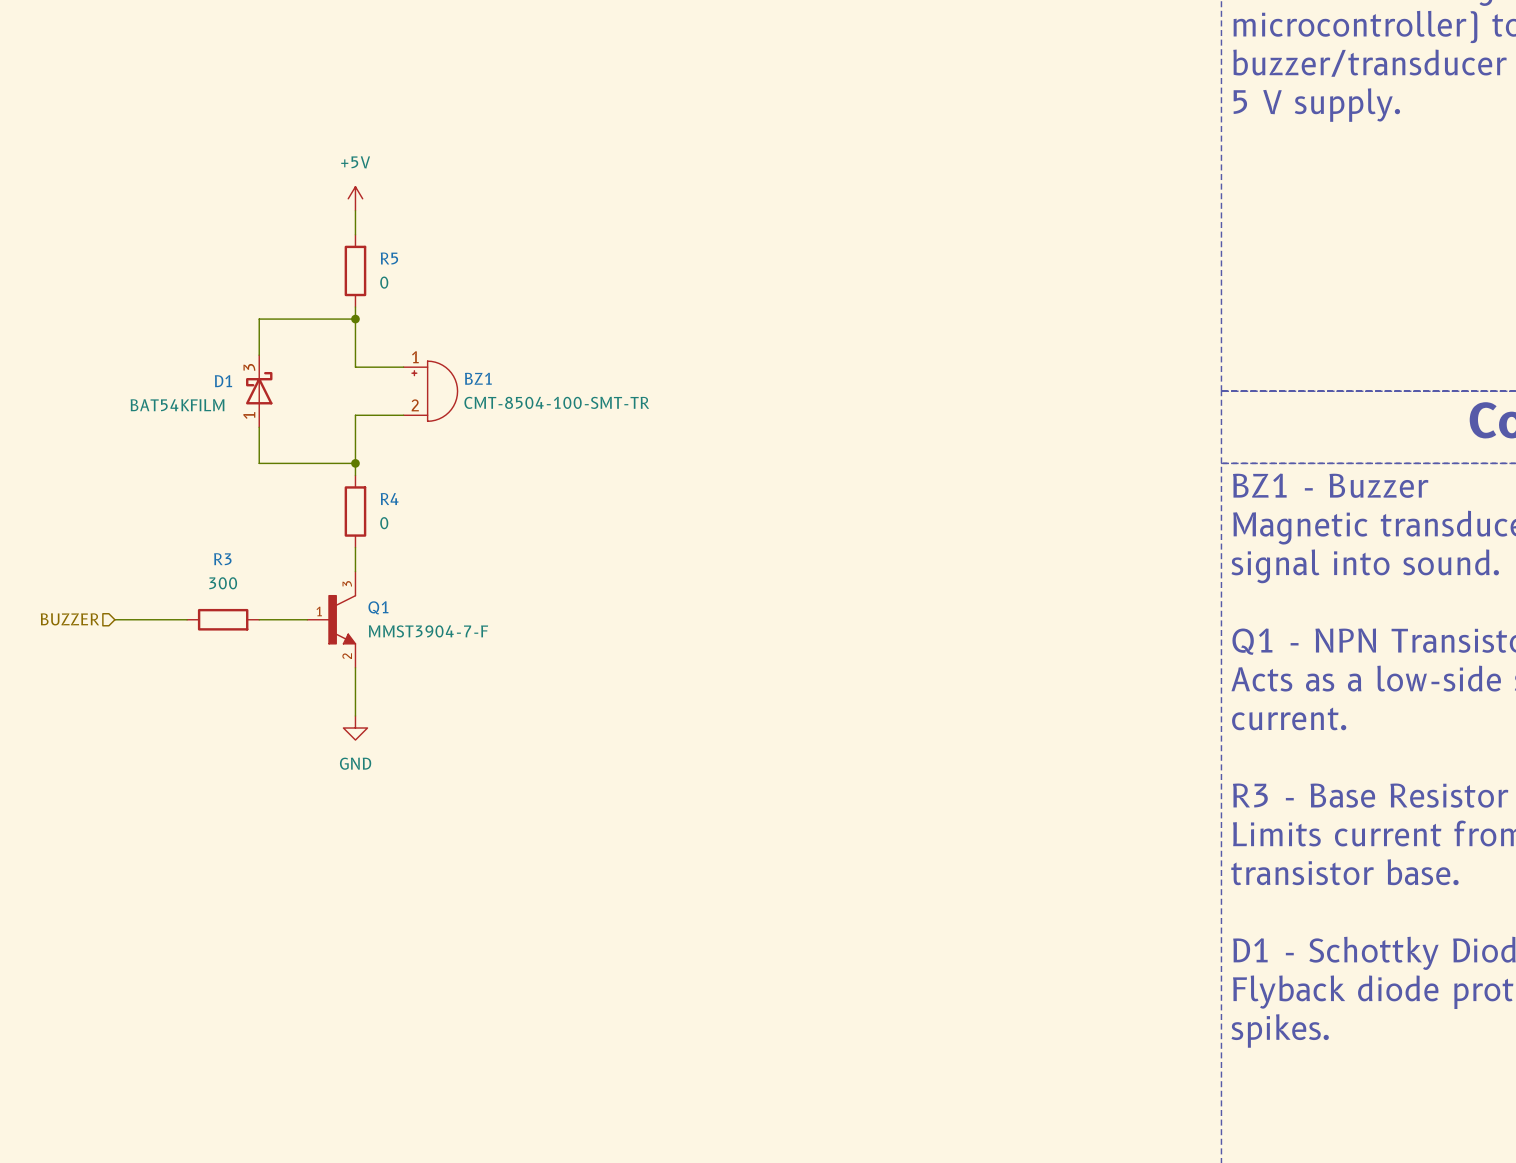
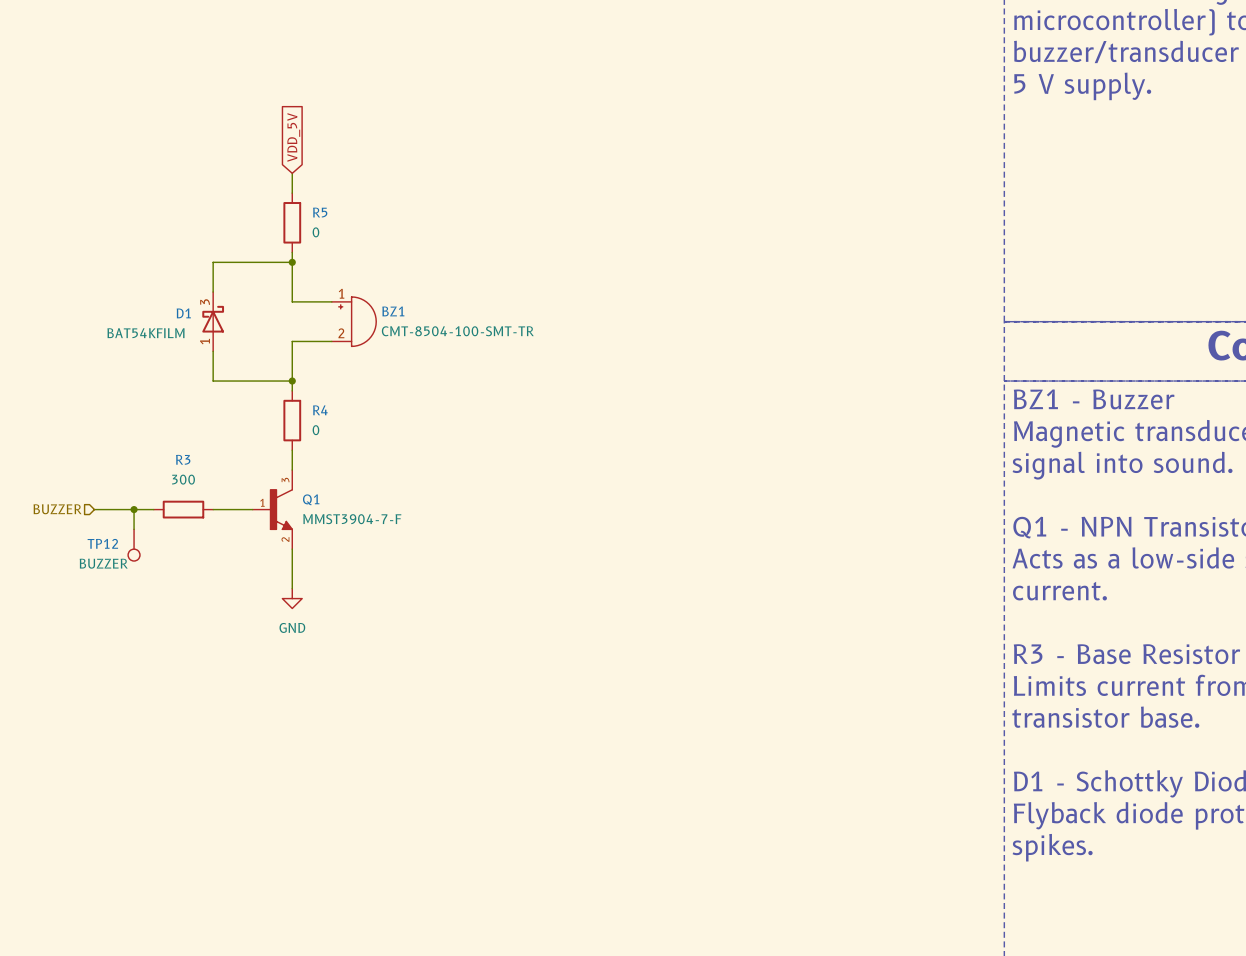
global label: none -> VDD_5V (293, 137)
power symbol: +5V (355, 198) -> none
wire: none -> (134, 509) (134, 529)
junction: none -> (134, 509)
TP12: none -> BUZZER (134, 545)

